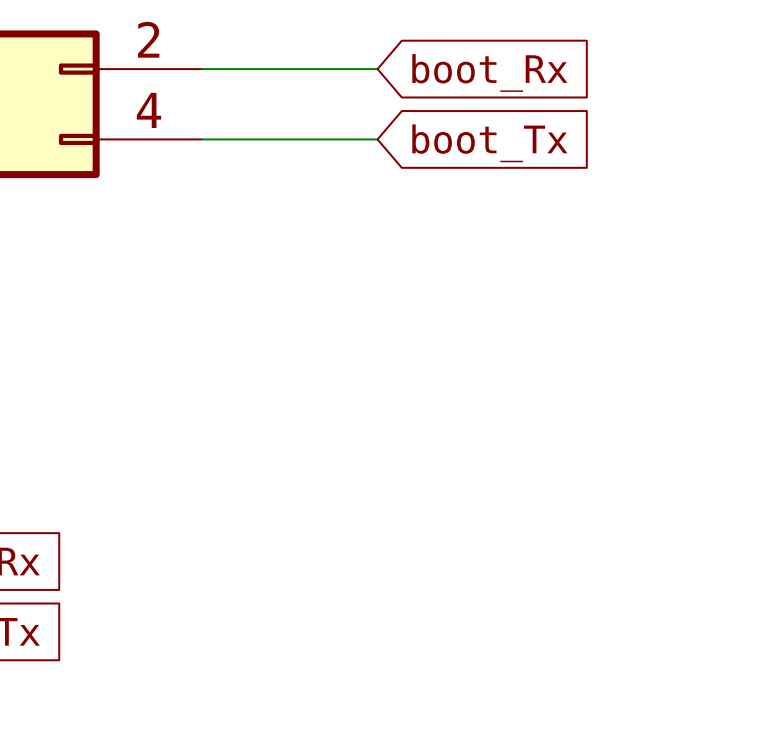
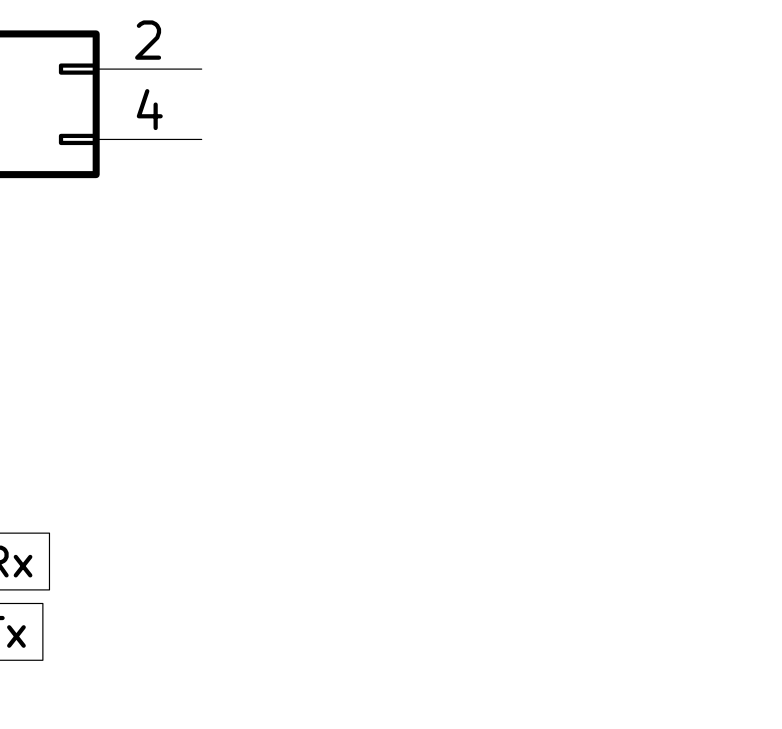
wire: (201, 69) (377, 69) -> none
global label: boot_Rx (489, 72) -> none
wire: (201, 139) (377, 139) -> none
global label: boot_Tx (489, 143) -> none

